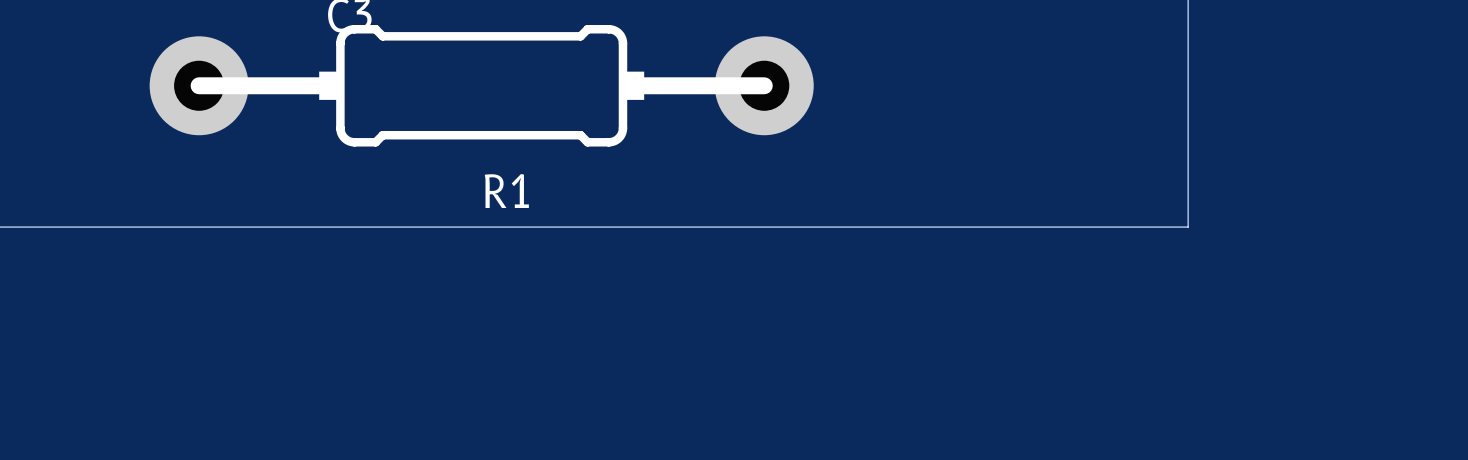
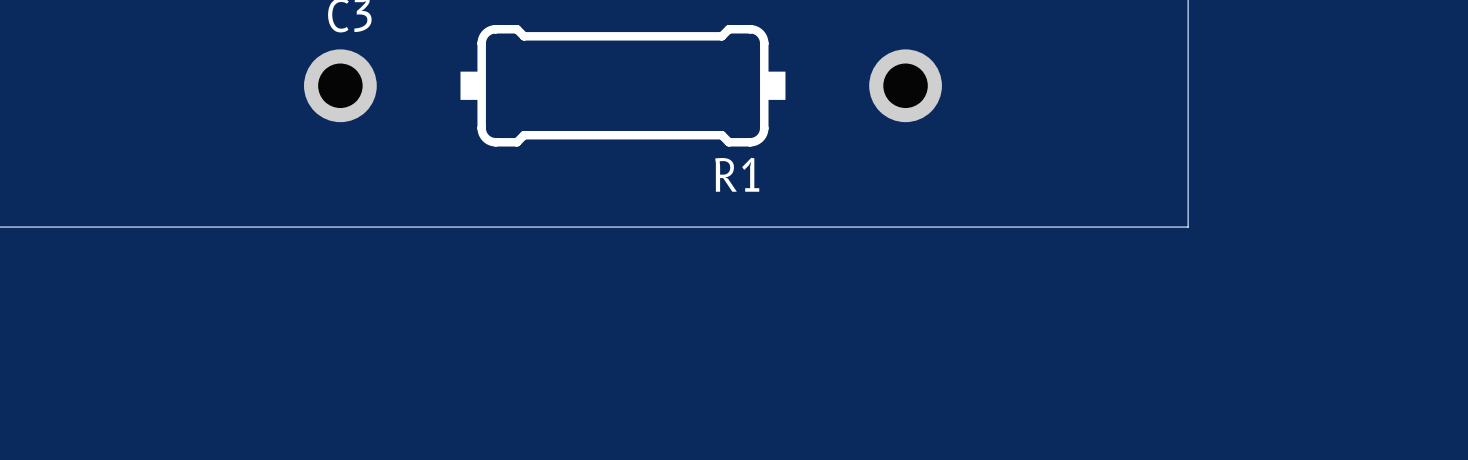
R1 footprint: [149, 25, 814, 147] -> [304, 25, 942, 147]

